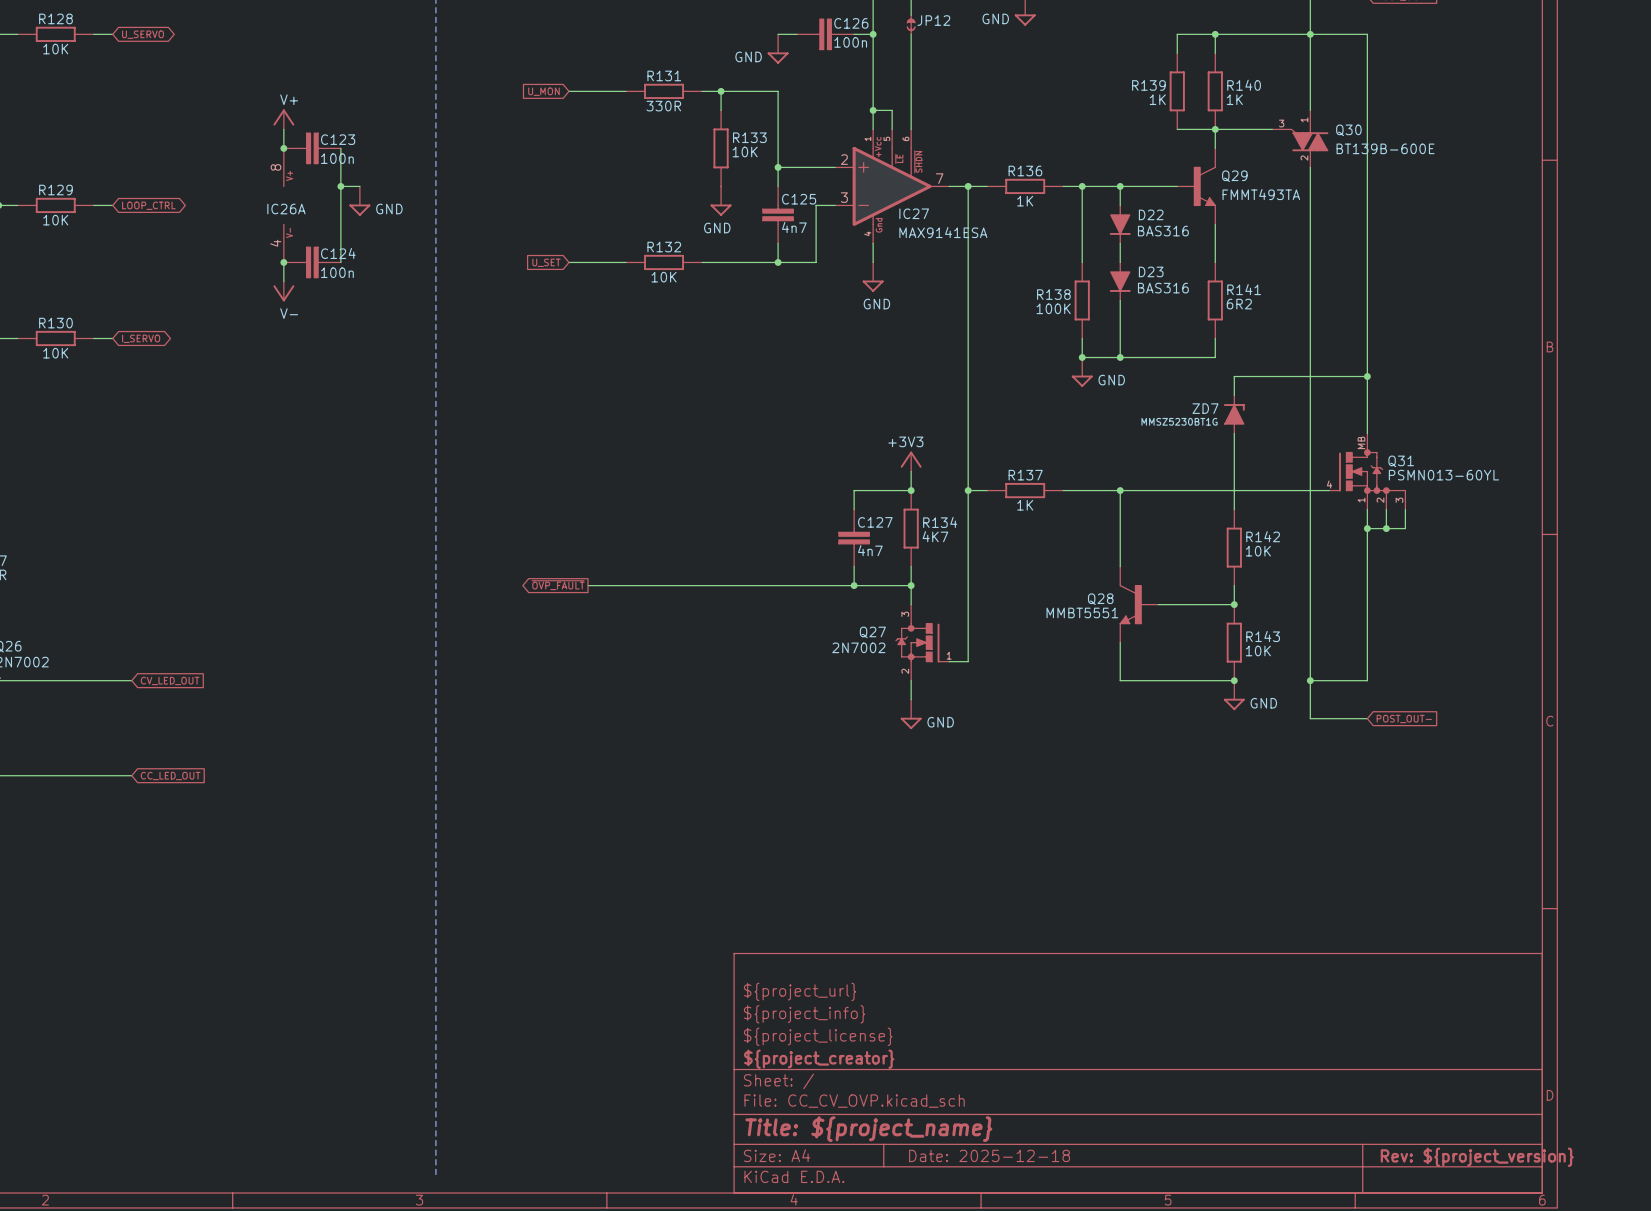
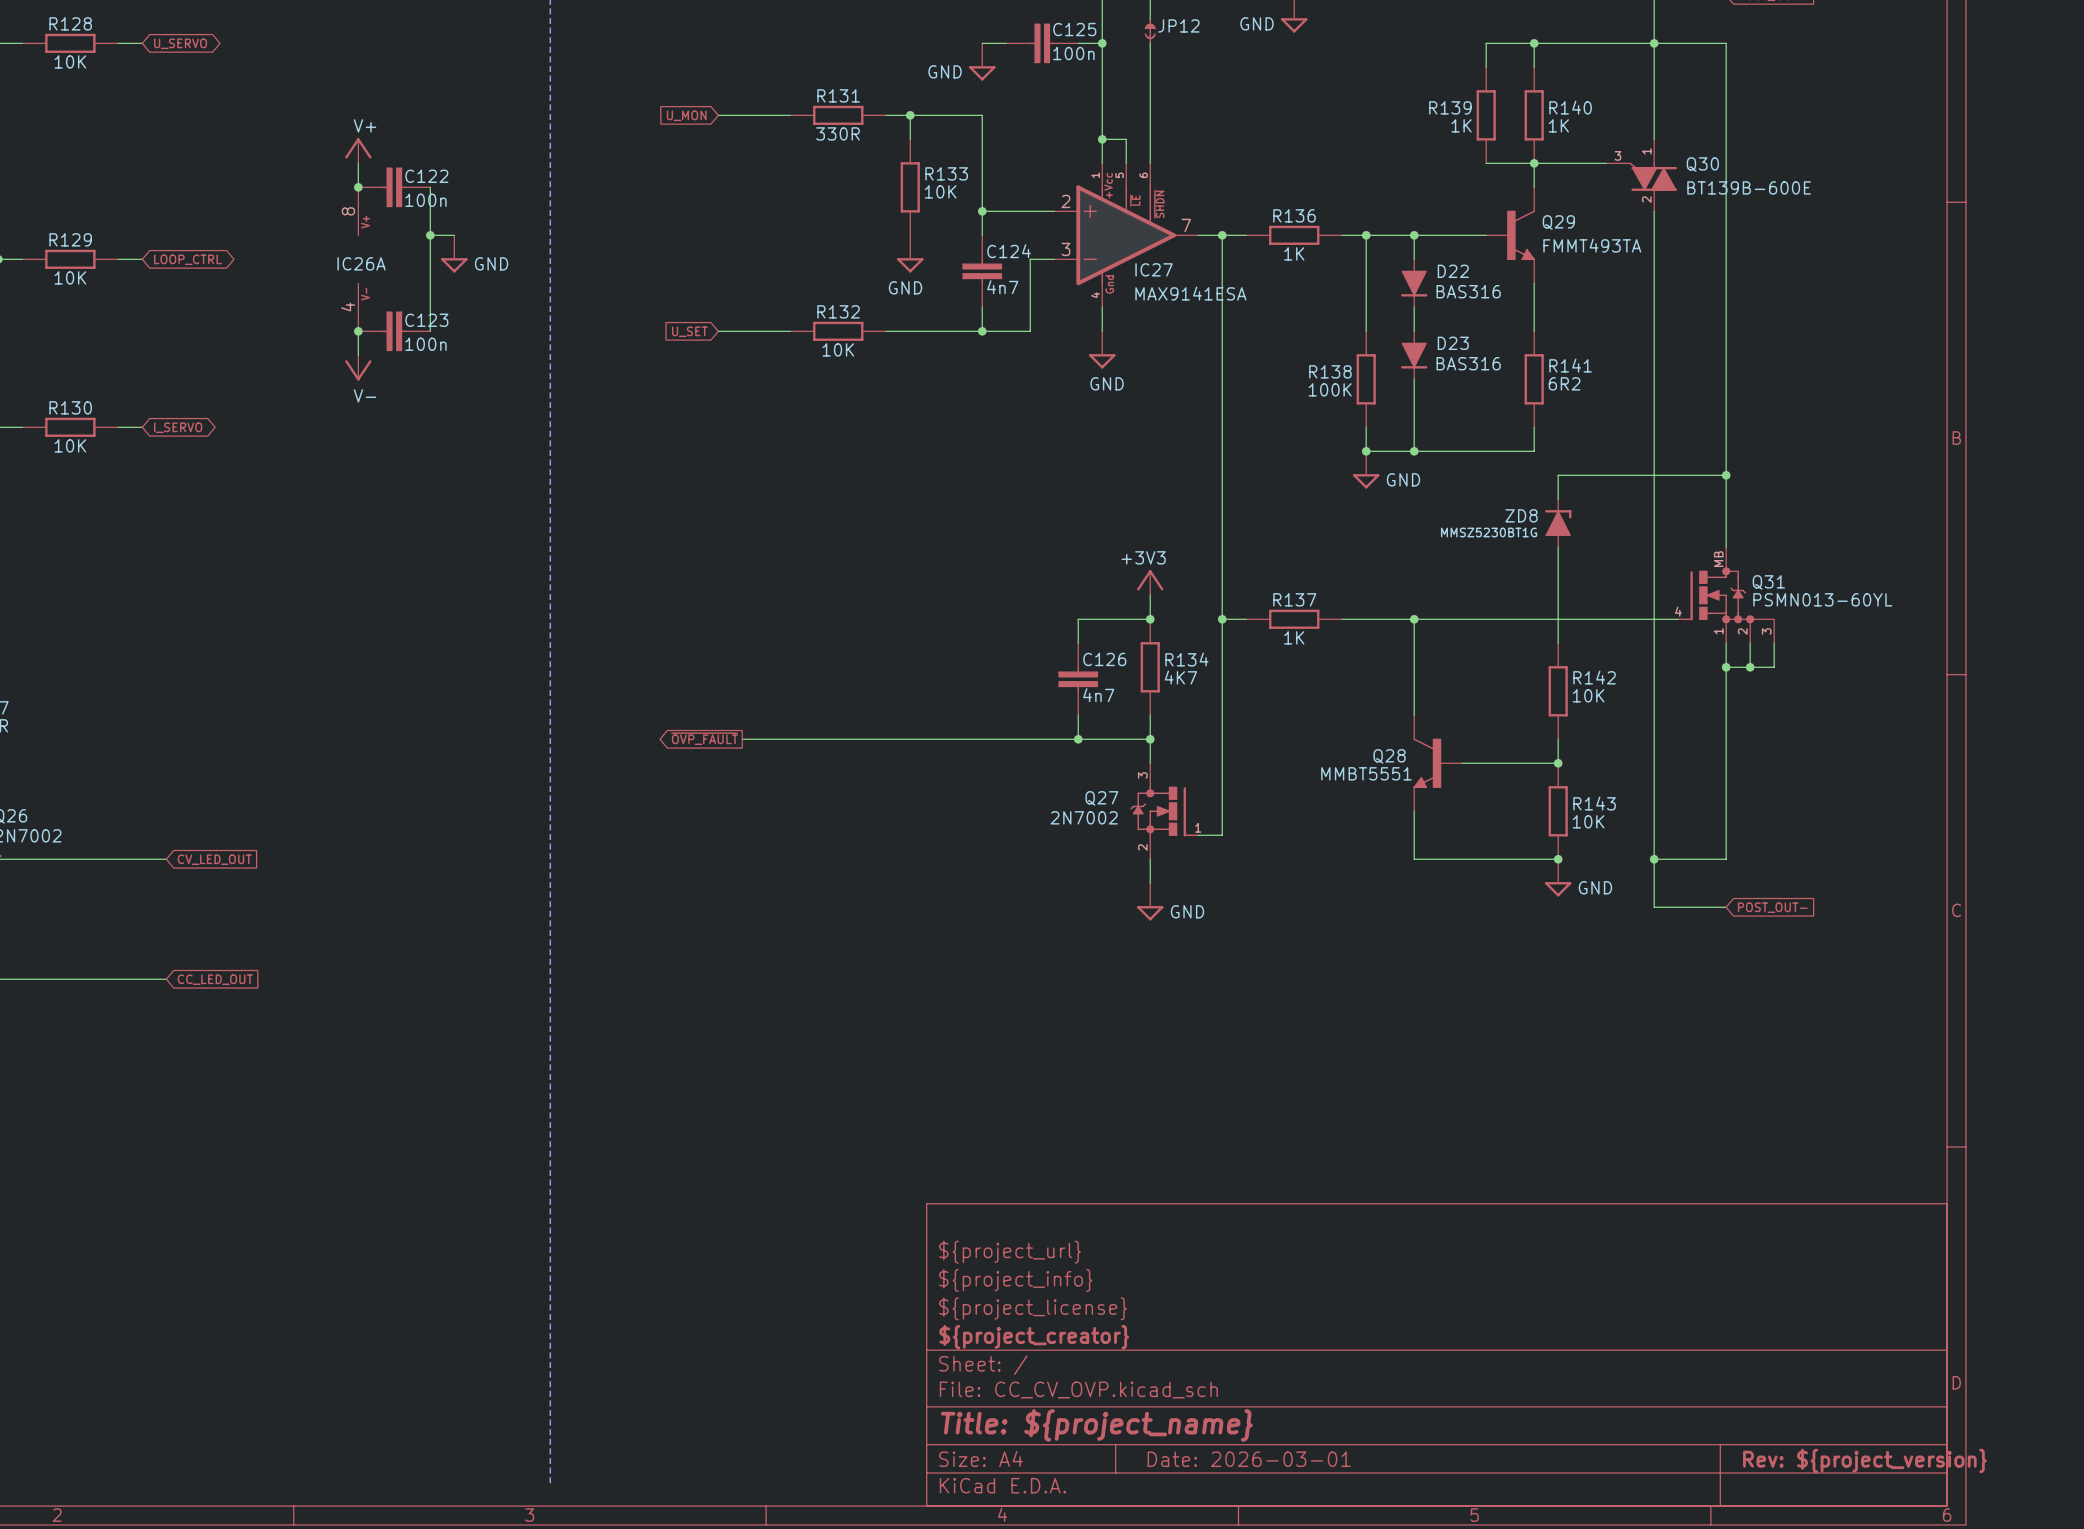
C126 name: C126 (851, 23) -> C125 (1074, 29)
C123 name: C123 (338, 139) -> C122 (426, 176)
C125 name: C125 (799, 199) -> C124 (1009, 251)
C124 name: C124 (338, 253) -> C123 (426, 320)
ZD7 name: ZD7 (1205, 408) -> ZD8 (1521, 515)
C127 name: C127 (875, 522) -> C126 (1104, 659)
title block: Date: 2025-12-18 (989, 1155) -> Date: 2026-03-01 (1249, 1459)

